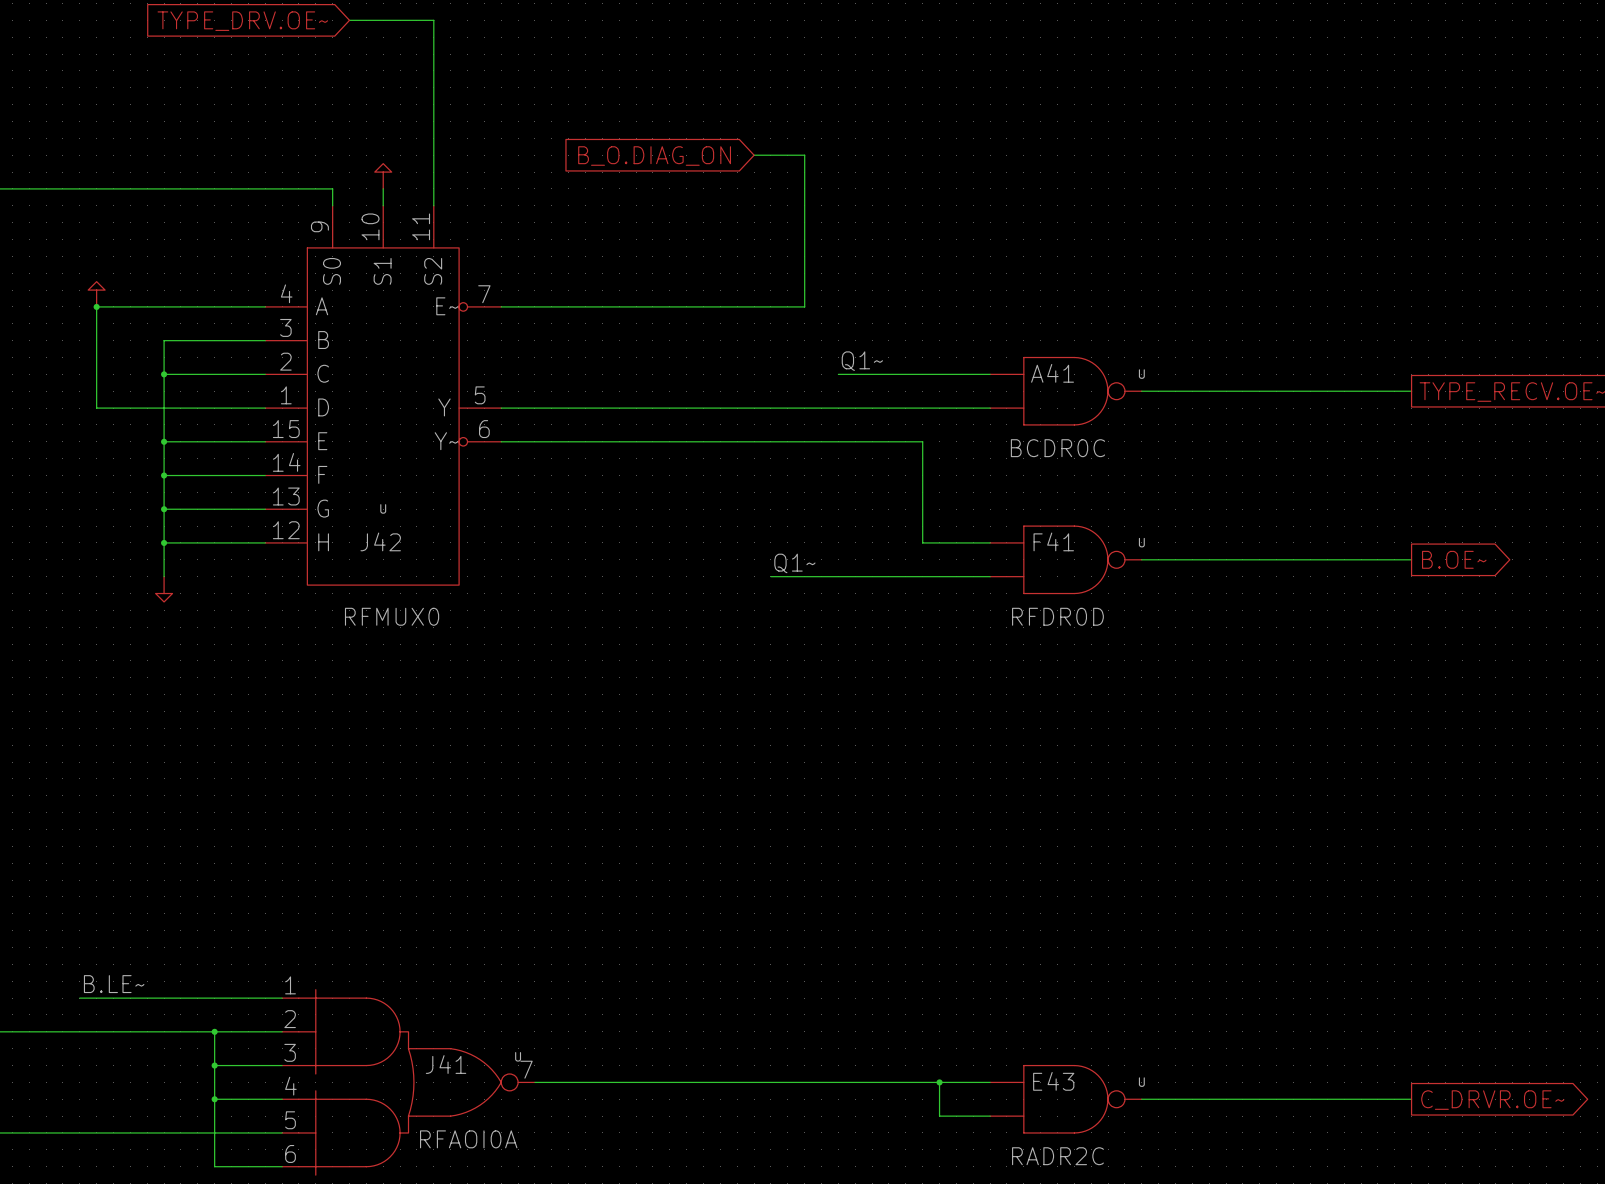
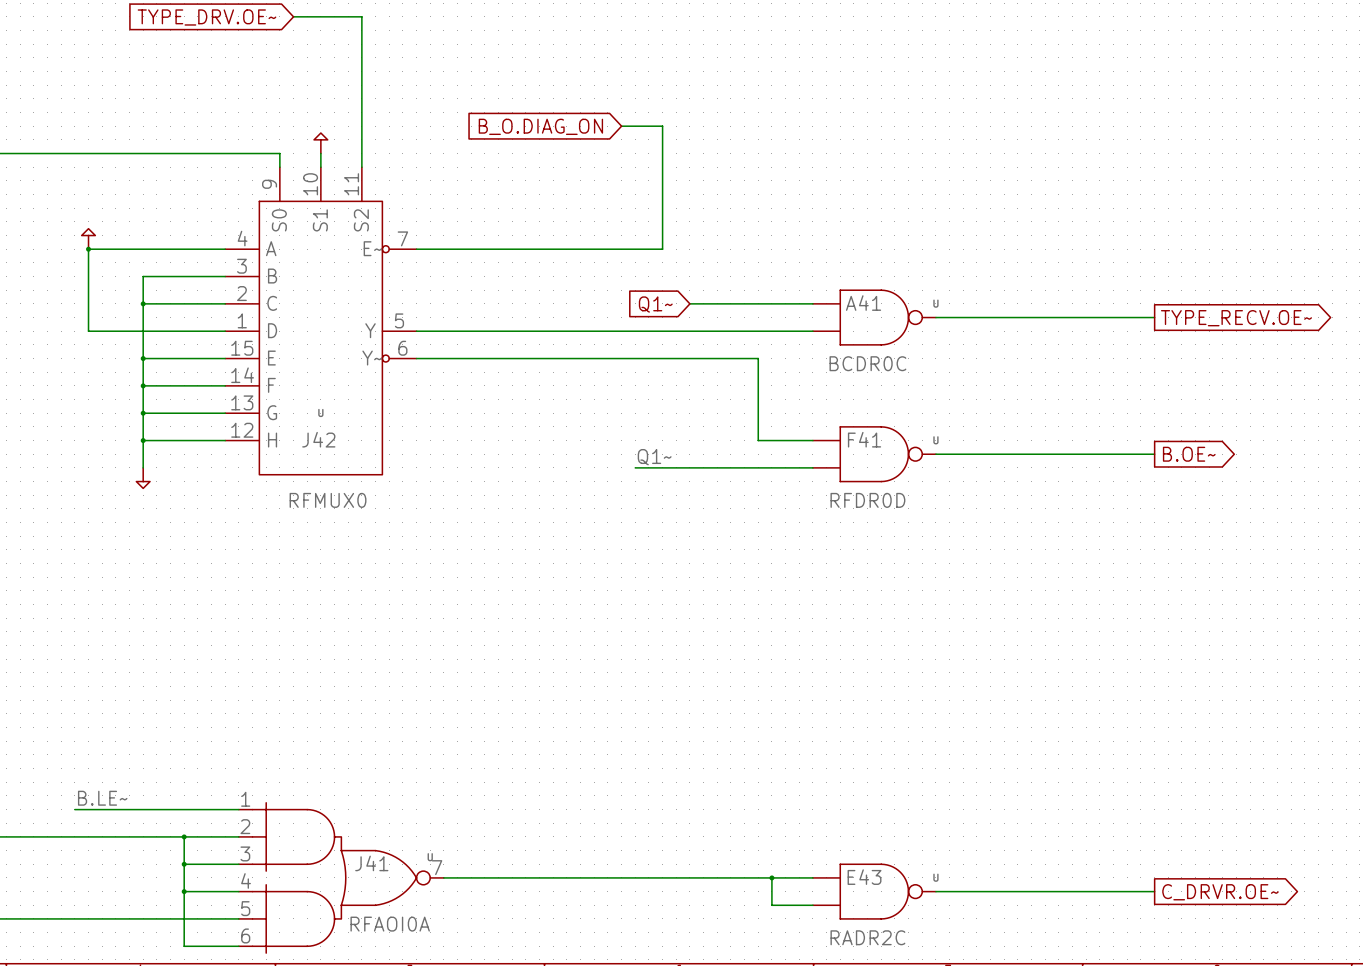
label: Q1~ (862, 361) -> none
global label: none -> Q1~ (655, 304)

